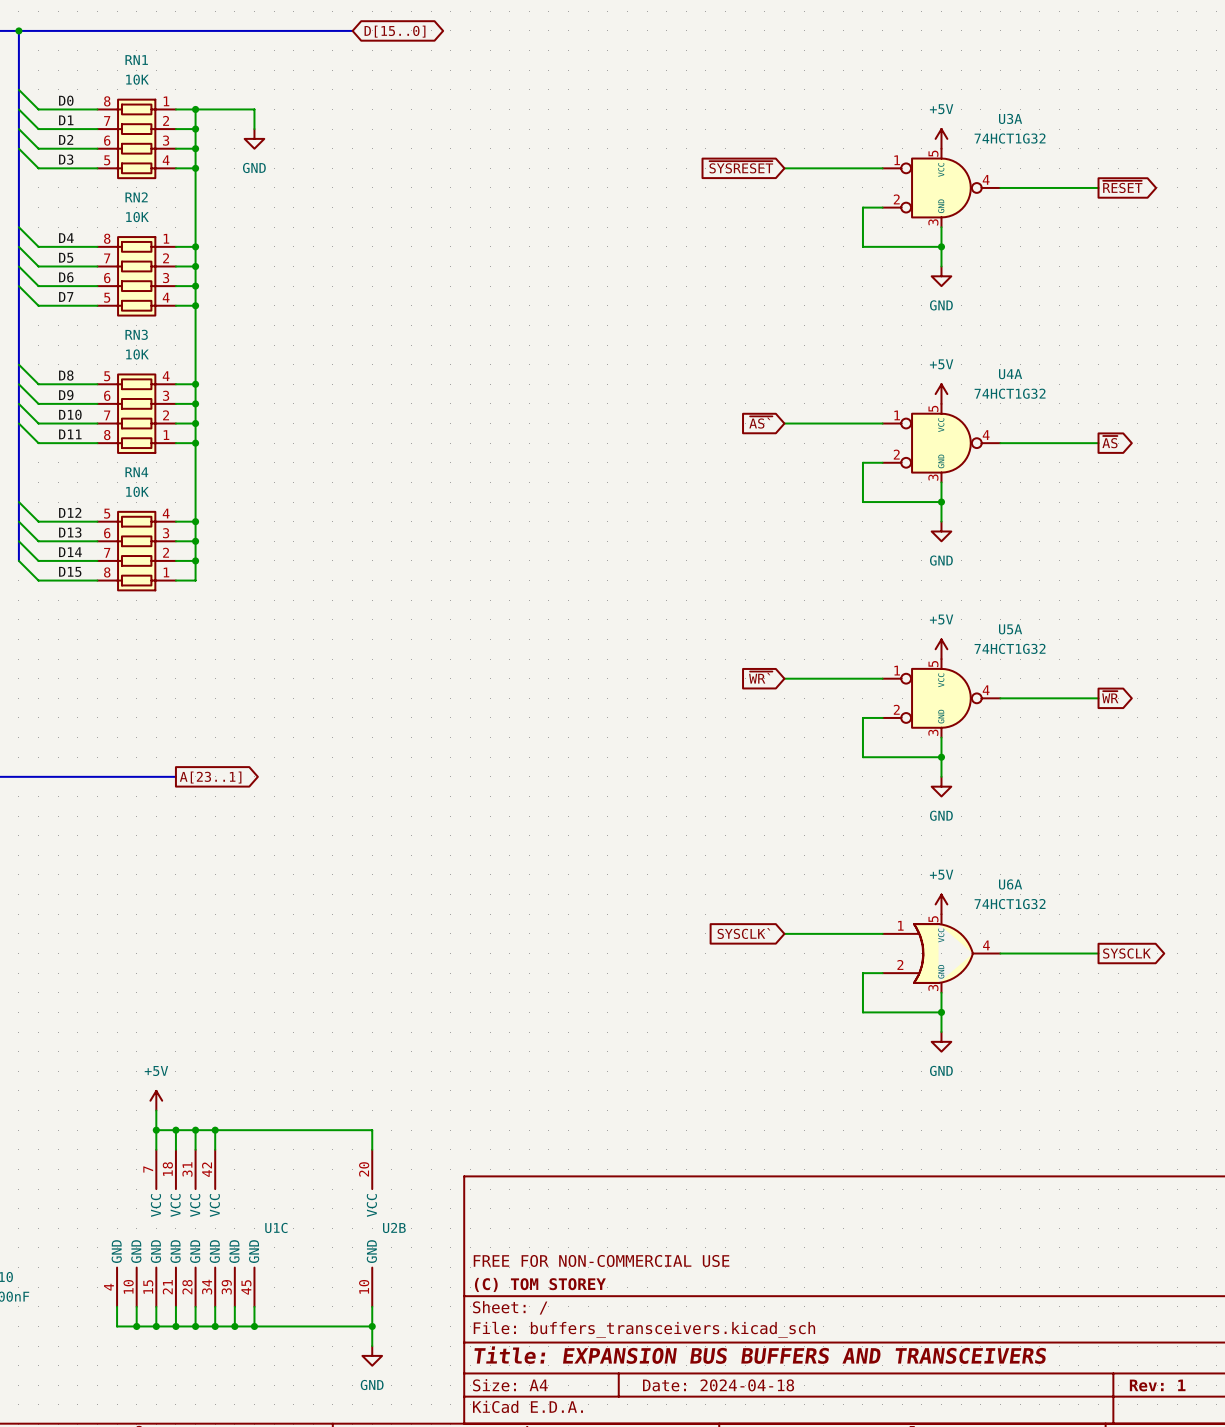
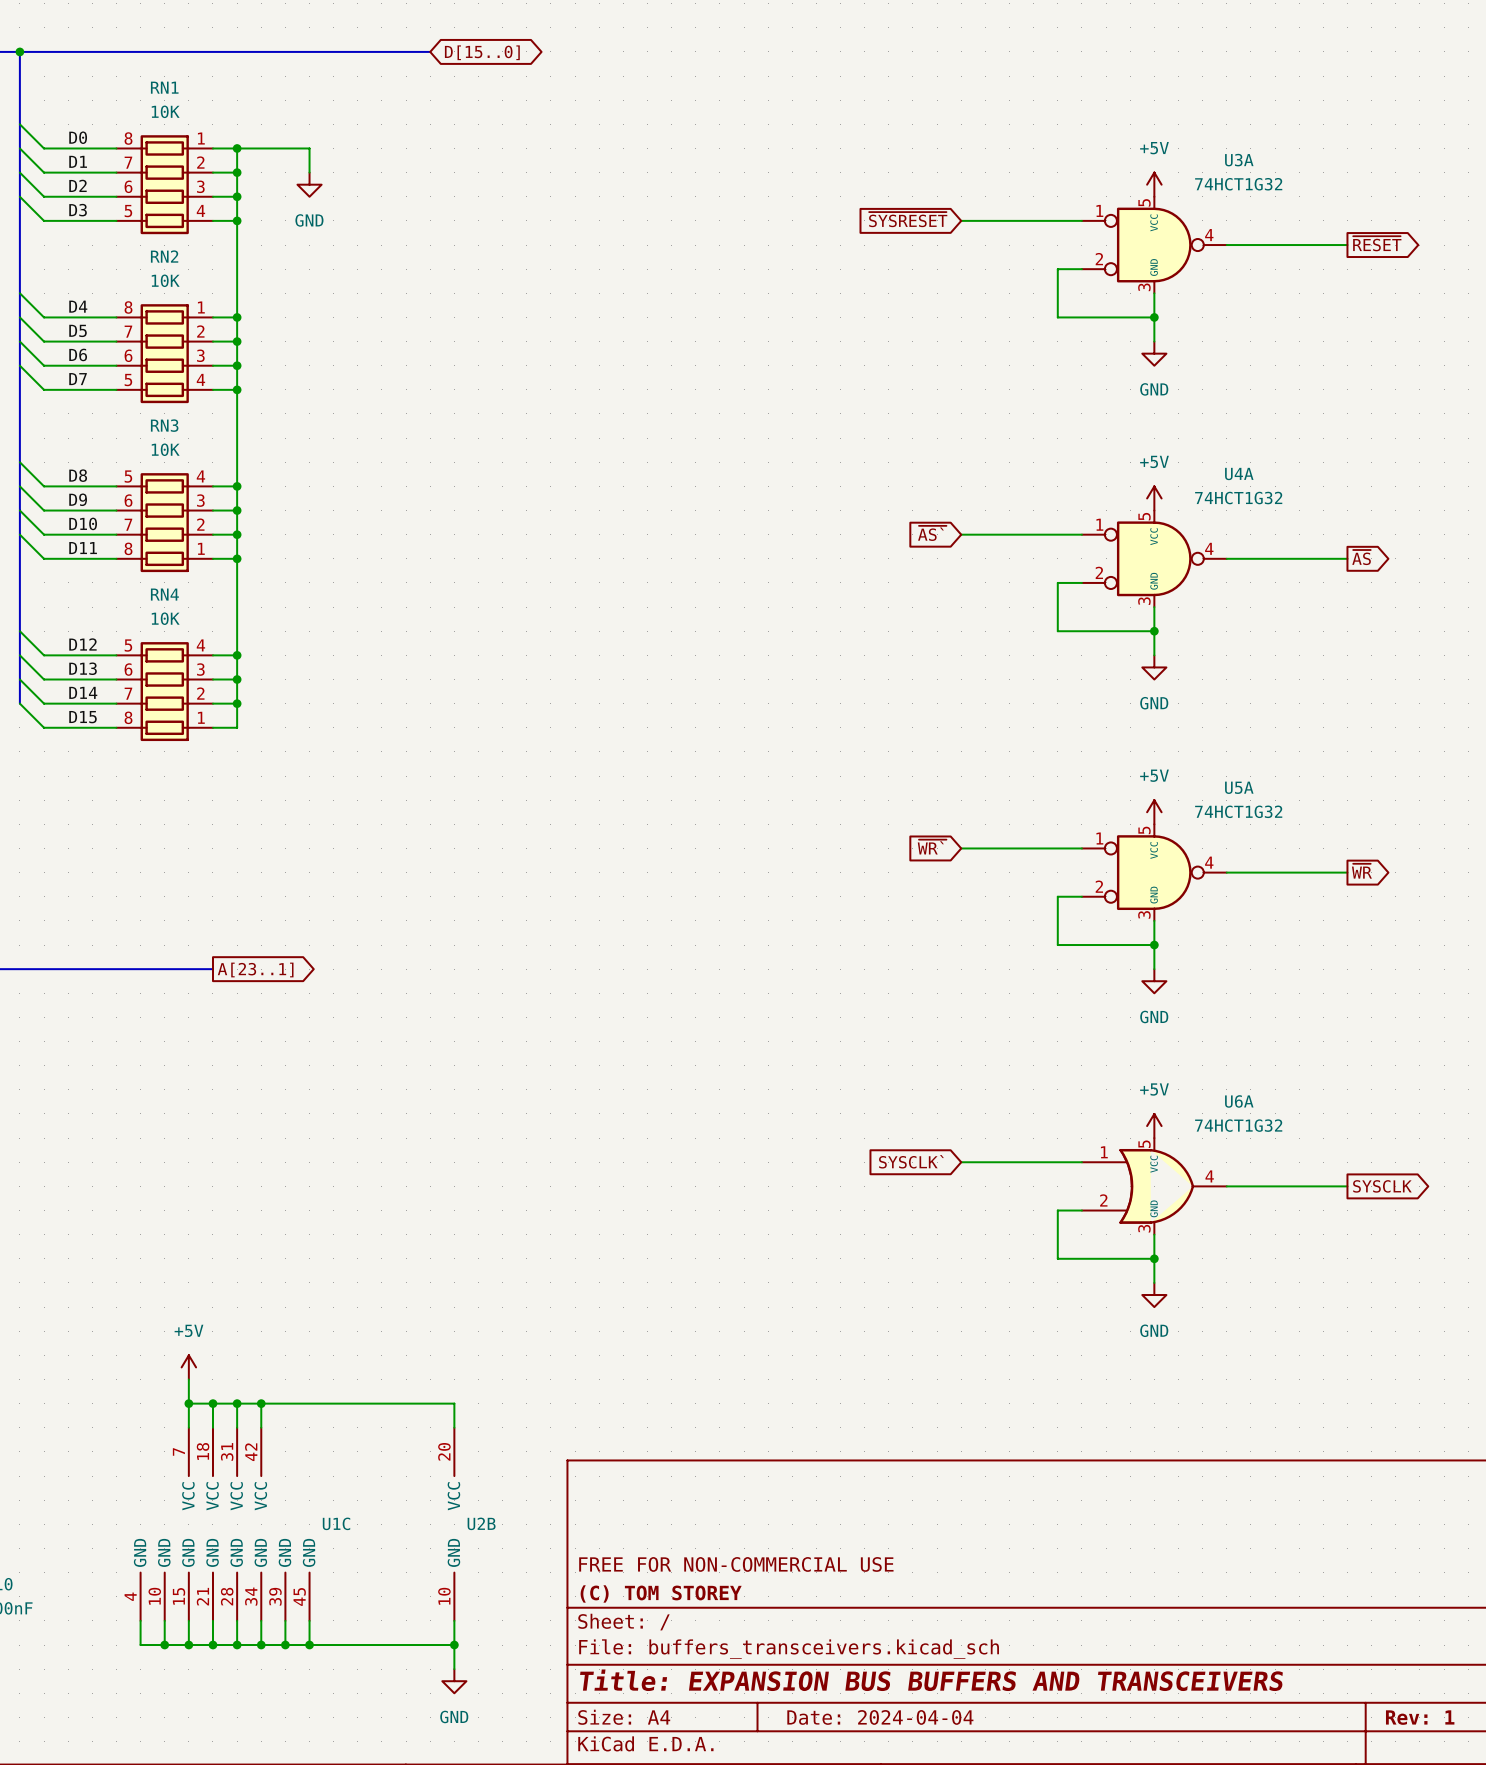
title block: Date: 2024-04-18 (718, 1385) -> Date: 2024-04-04 (880, 1717)

